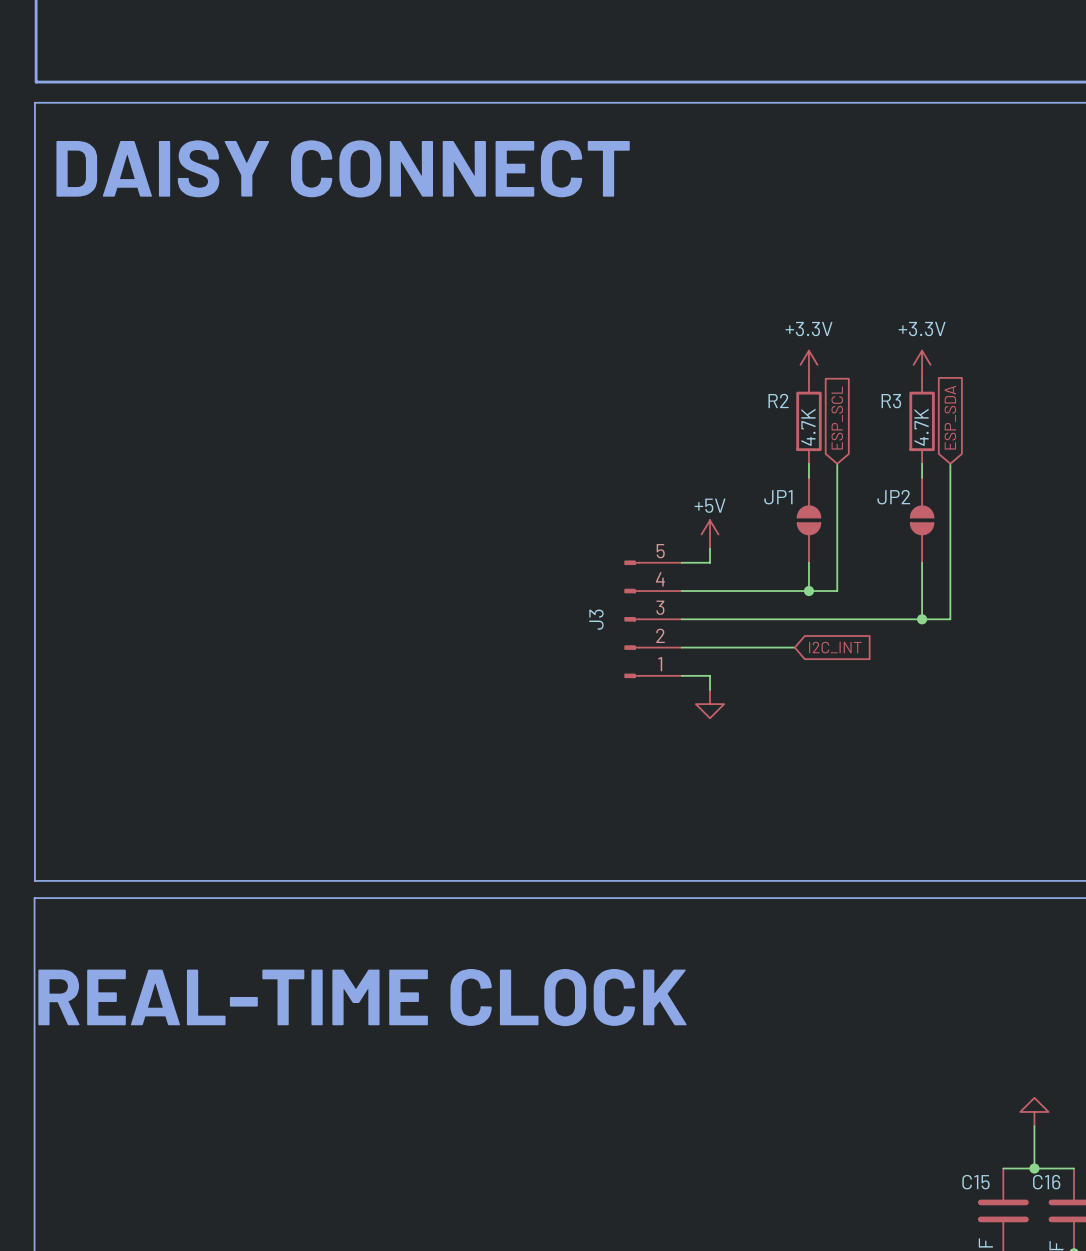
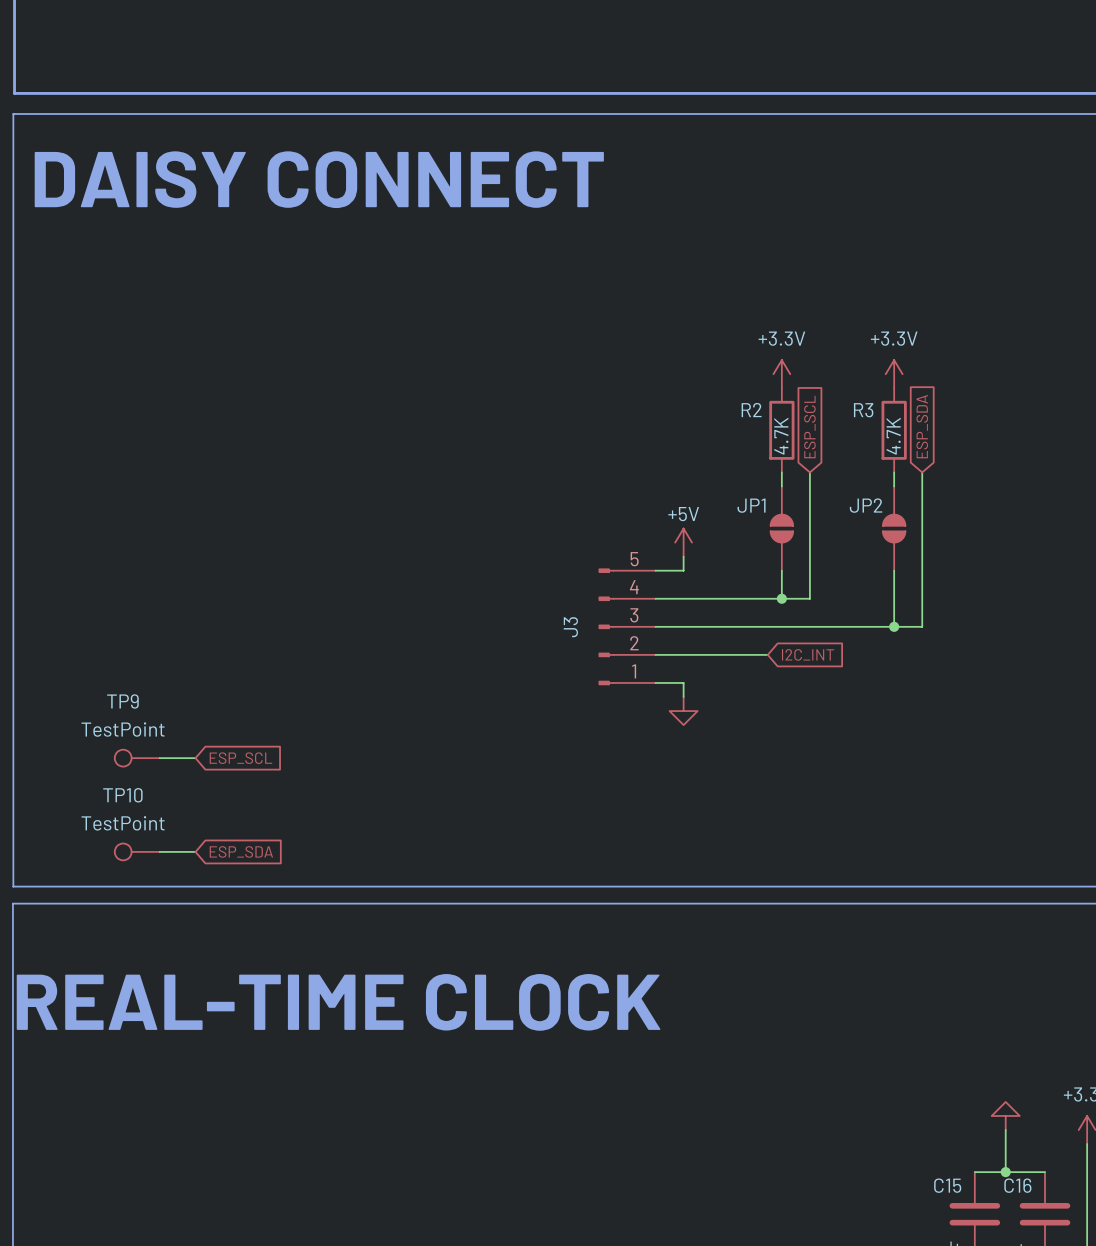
TP9: none -> TestPoint (137, 758)
wire: none -> (159, 758) (195, 758)
global label: none -> ESP_SCL (240, 758)
TP10: none -> TestPoint (137, 851)
wire: none -> (159, 851) (195, 851)
global label: none -> ESP_SDA (241, 851)

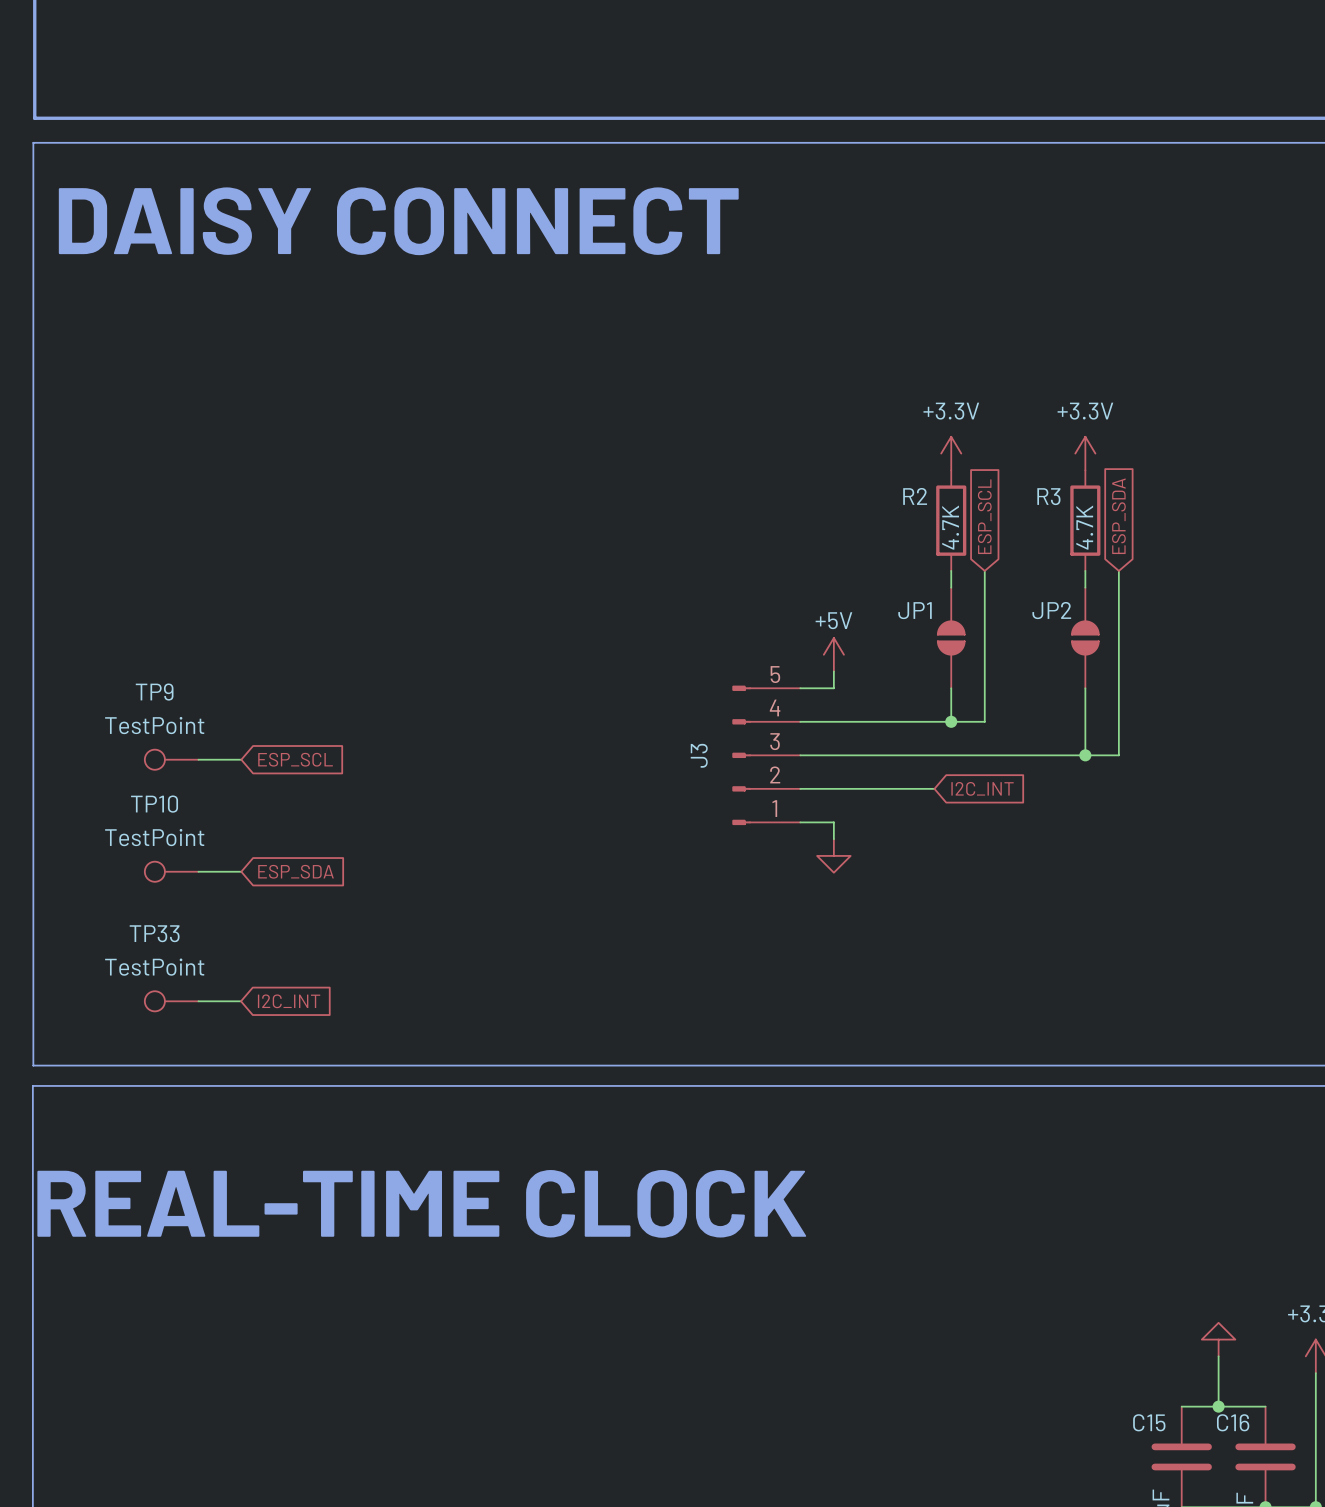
TP9 position: (137, 758) -> (171, 759)
wire: (159, 758) (195, 758) -> (198, 871) (241, 871)
global label position: ESP_SCL (240, 758) -> ESP_SCL (295, 759)
TP33: none -> TestPoint (171, 1001)
wire: none -> (198, 1001) (241, 1001)
global label: none -> I2C_INT (289, 1001)
TP10 position: (137, 851) -> (171, 871)
wire: (159, 851) (195, 851) -> (198, 759) (241, 759)
global label position: ESP_SDA (241, 851) -> ESP_SDA (296, 871)

